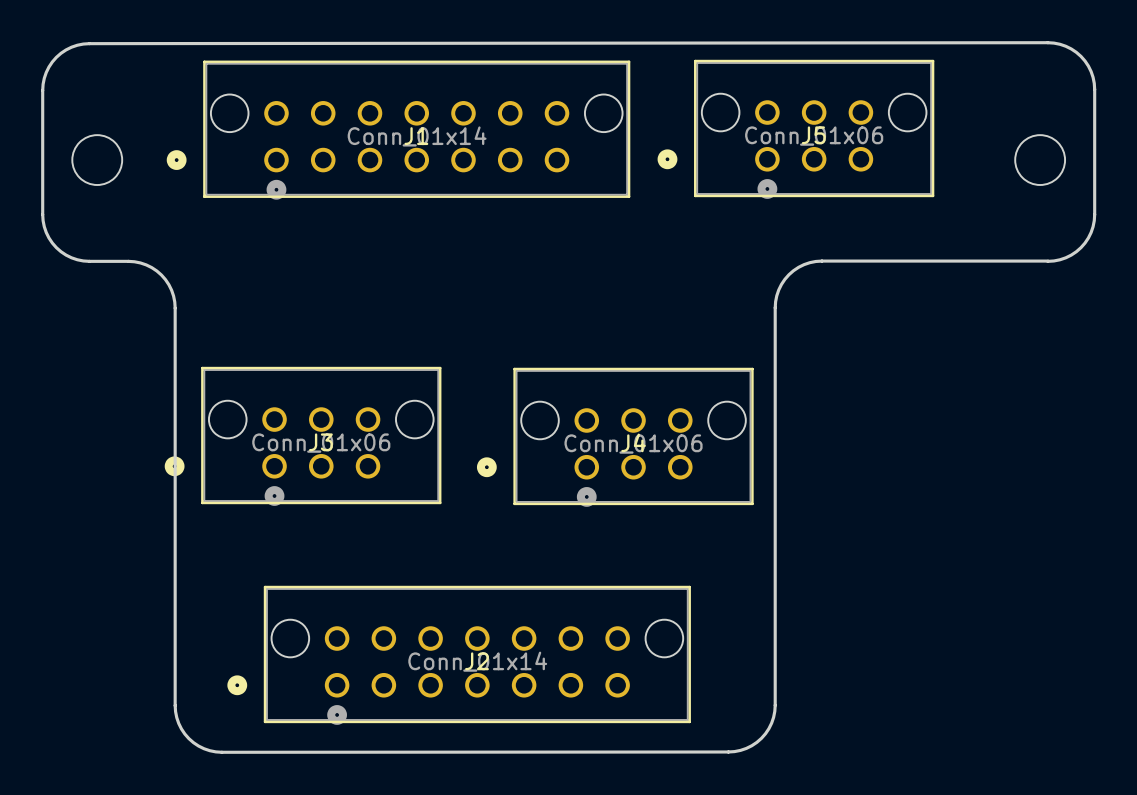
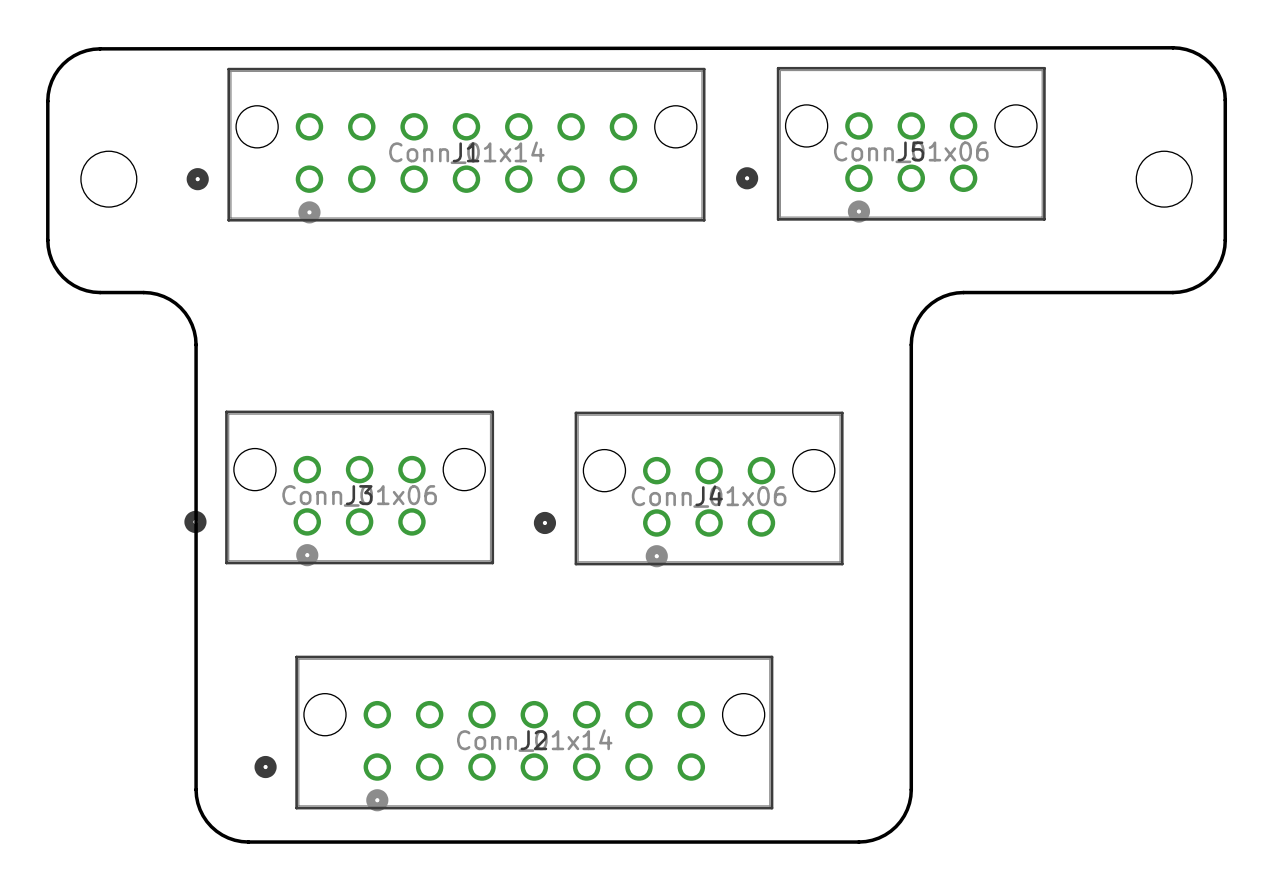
board edge: (1047, 261) (815, 261) (804, 264) (793, 270) (781, 284) (776, 295) (775, 307) (775, 705) (773, 717) (768, 728) (761, 738) (751, 745) (740, 750) (728, 751) (221, 752) -> (1172, 292) (956, 292) (943, 296) (931, 303) (918, 318) (913, 331) (911, 344) (911, 789) (909, 803) (904, 815) (895, 826) (885, 835) (872, 840) (858, 842) (248, 842)

